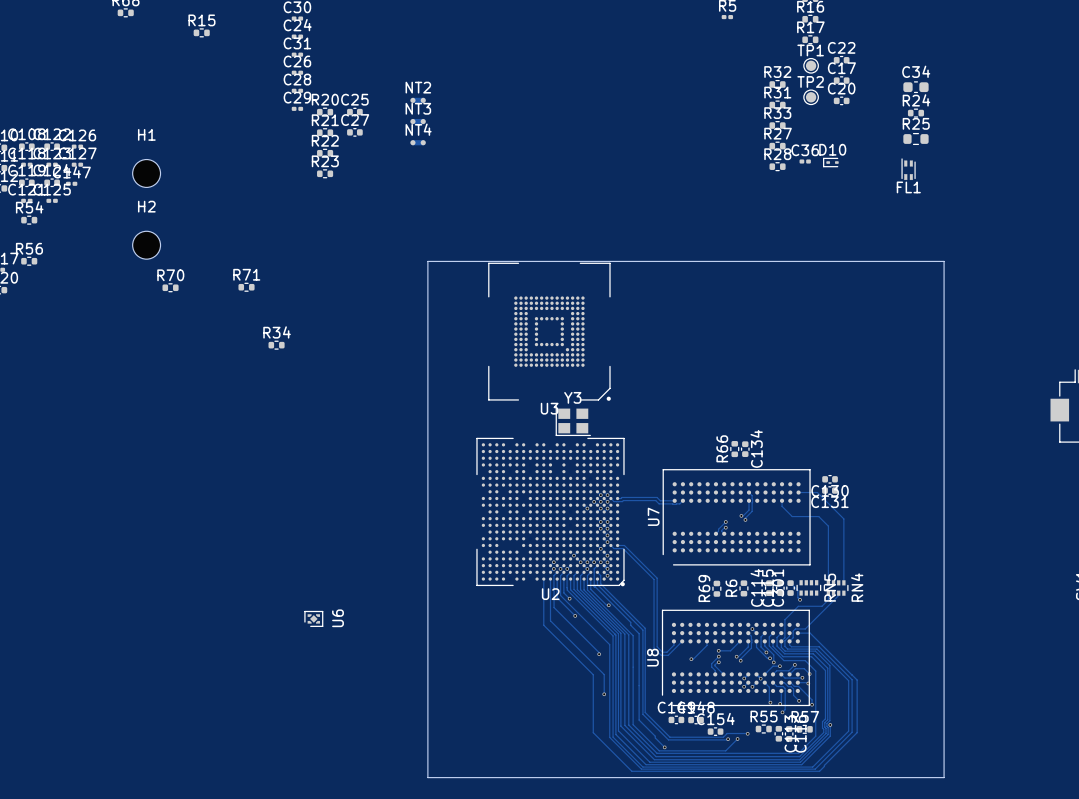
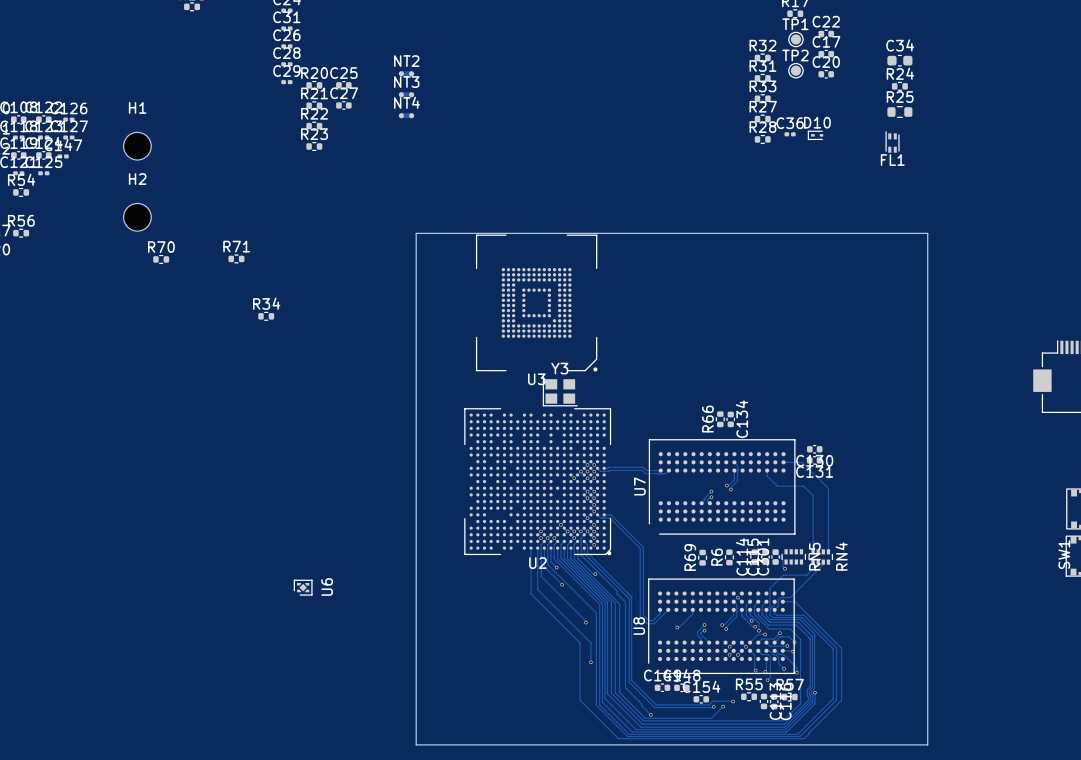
track: (740, 641) (730, 650) (718, 650) -> none
via: (718, 650) -> none

